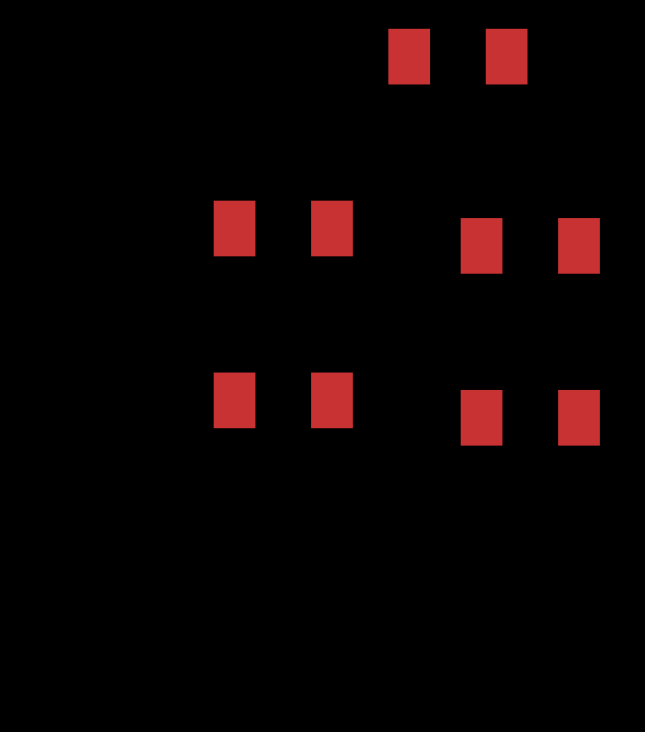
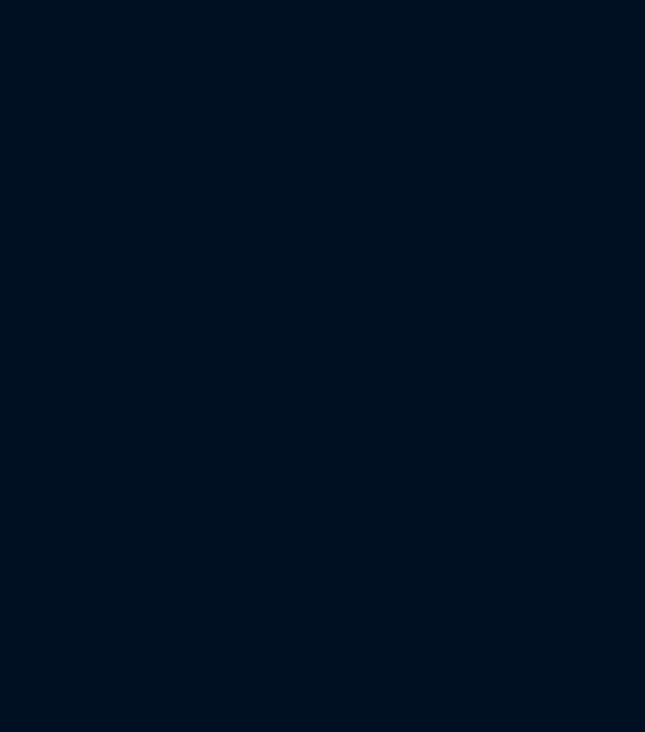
part: (457, 56) -> none
part: (283, 228) -> none
part: (530, 245) -> none
part: (283, 400) -> none
part: (530, 417) -> none

